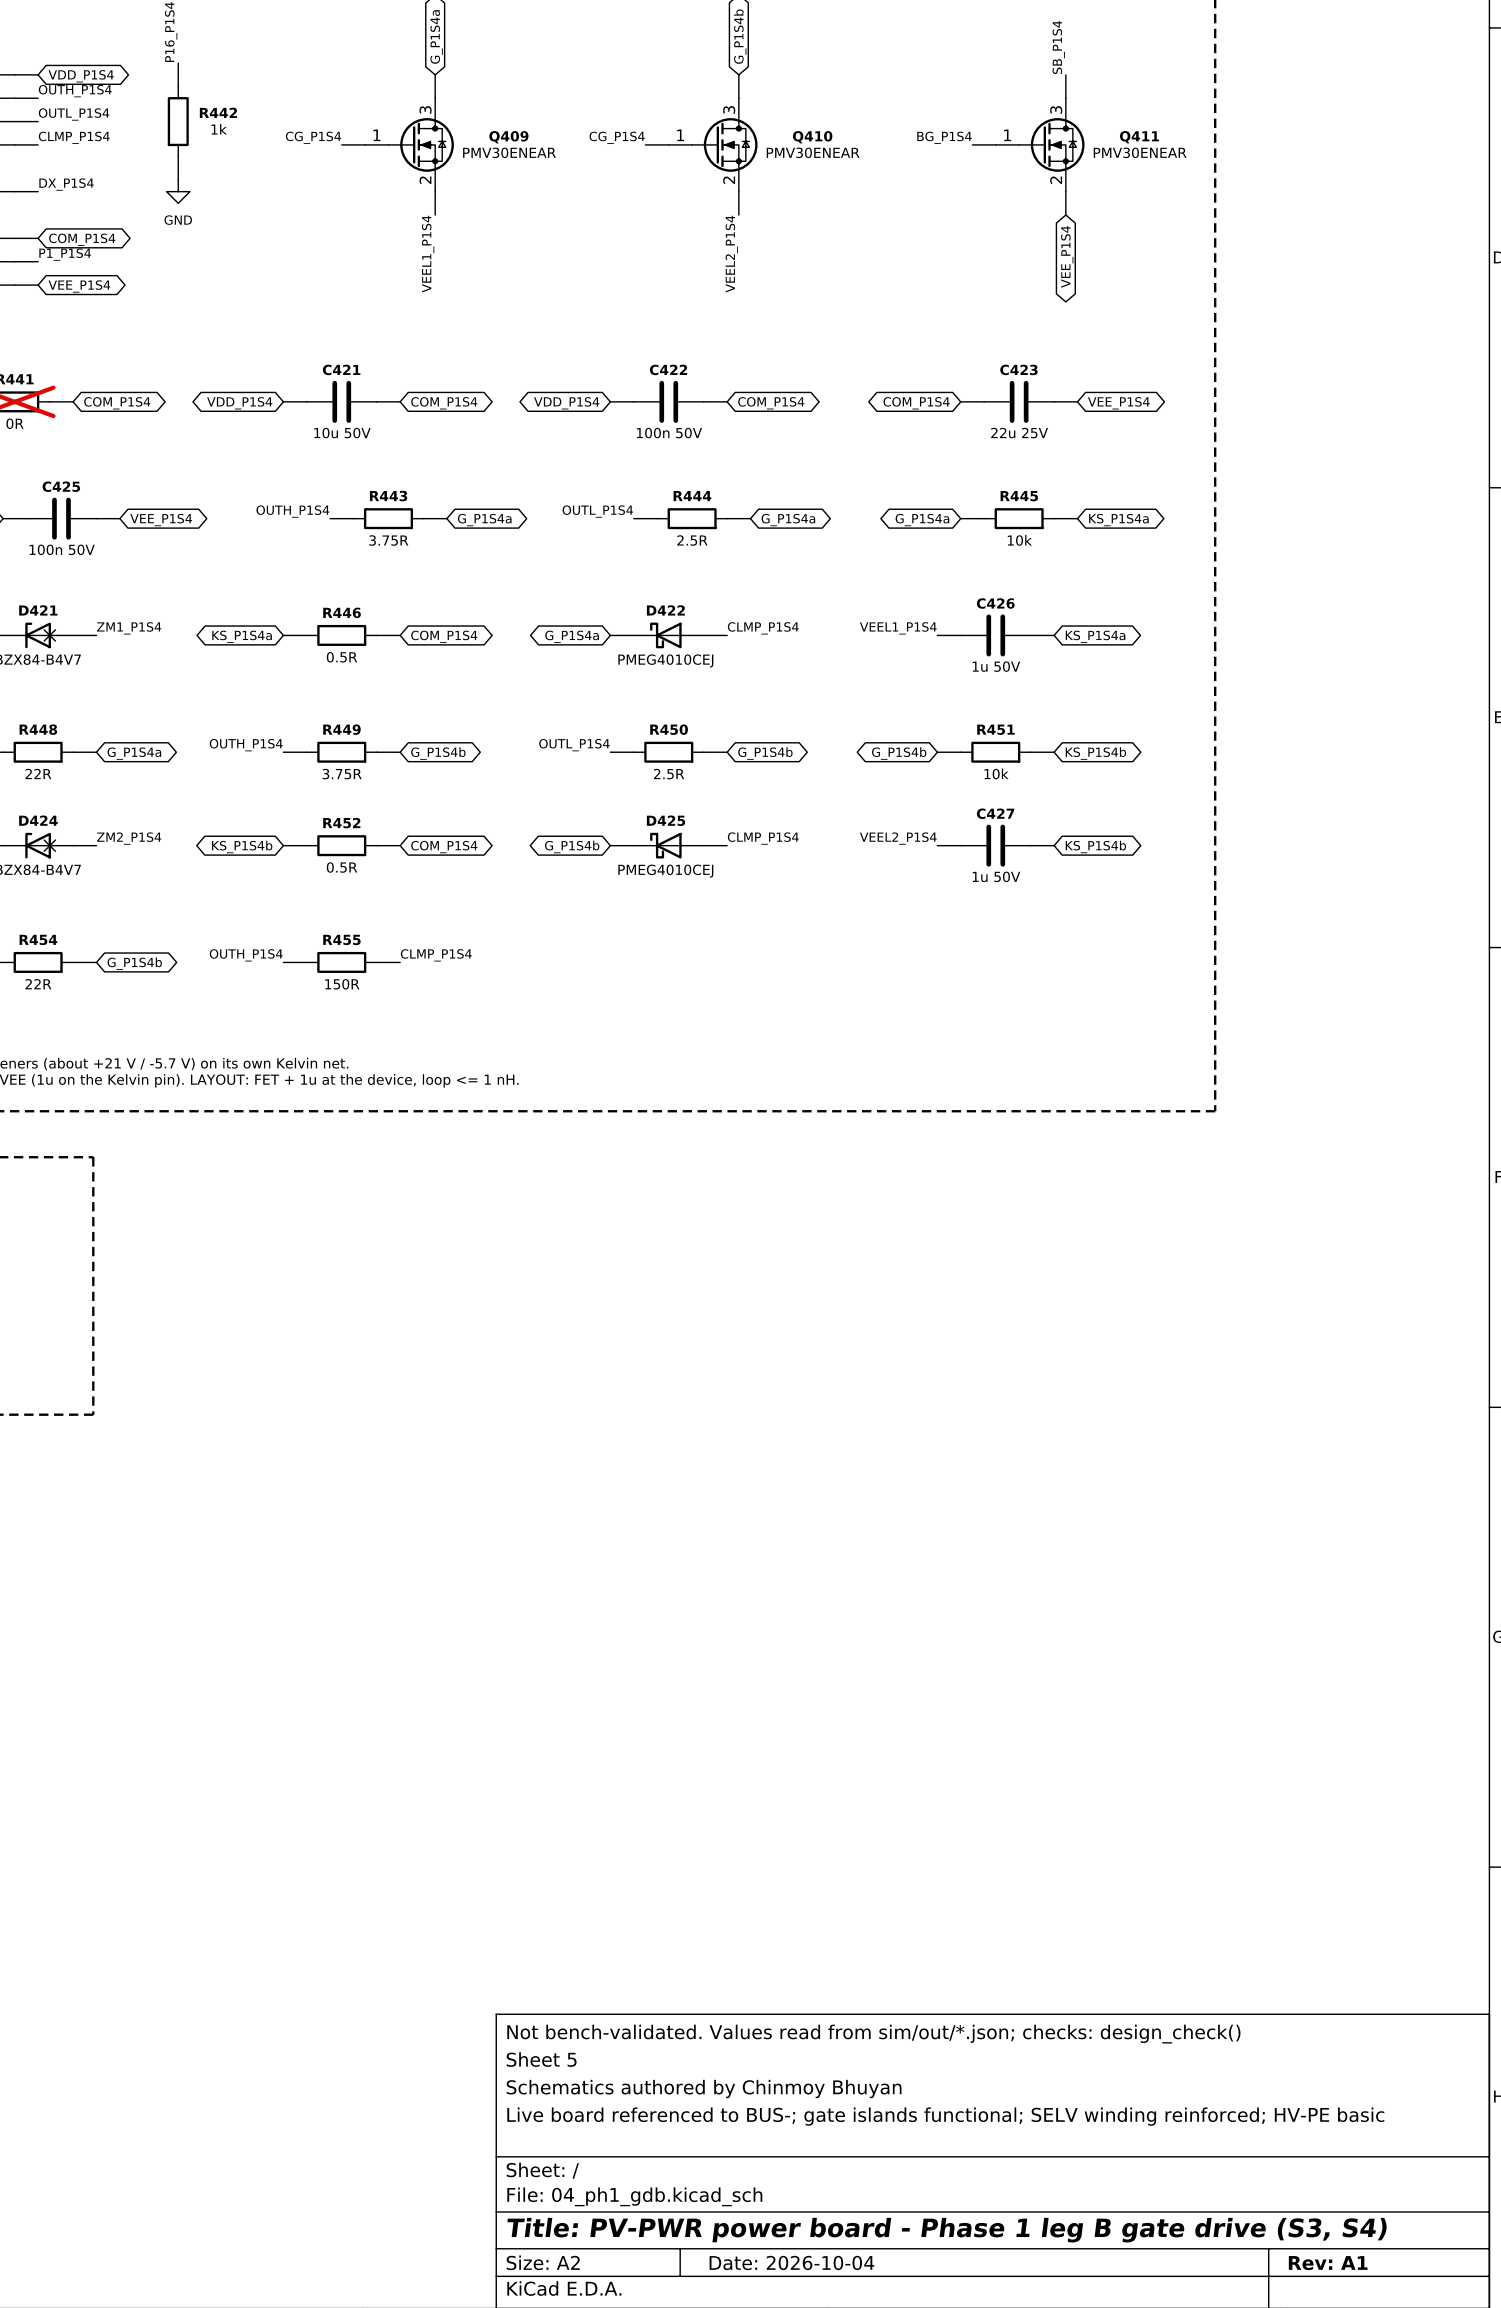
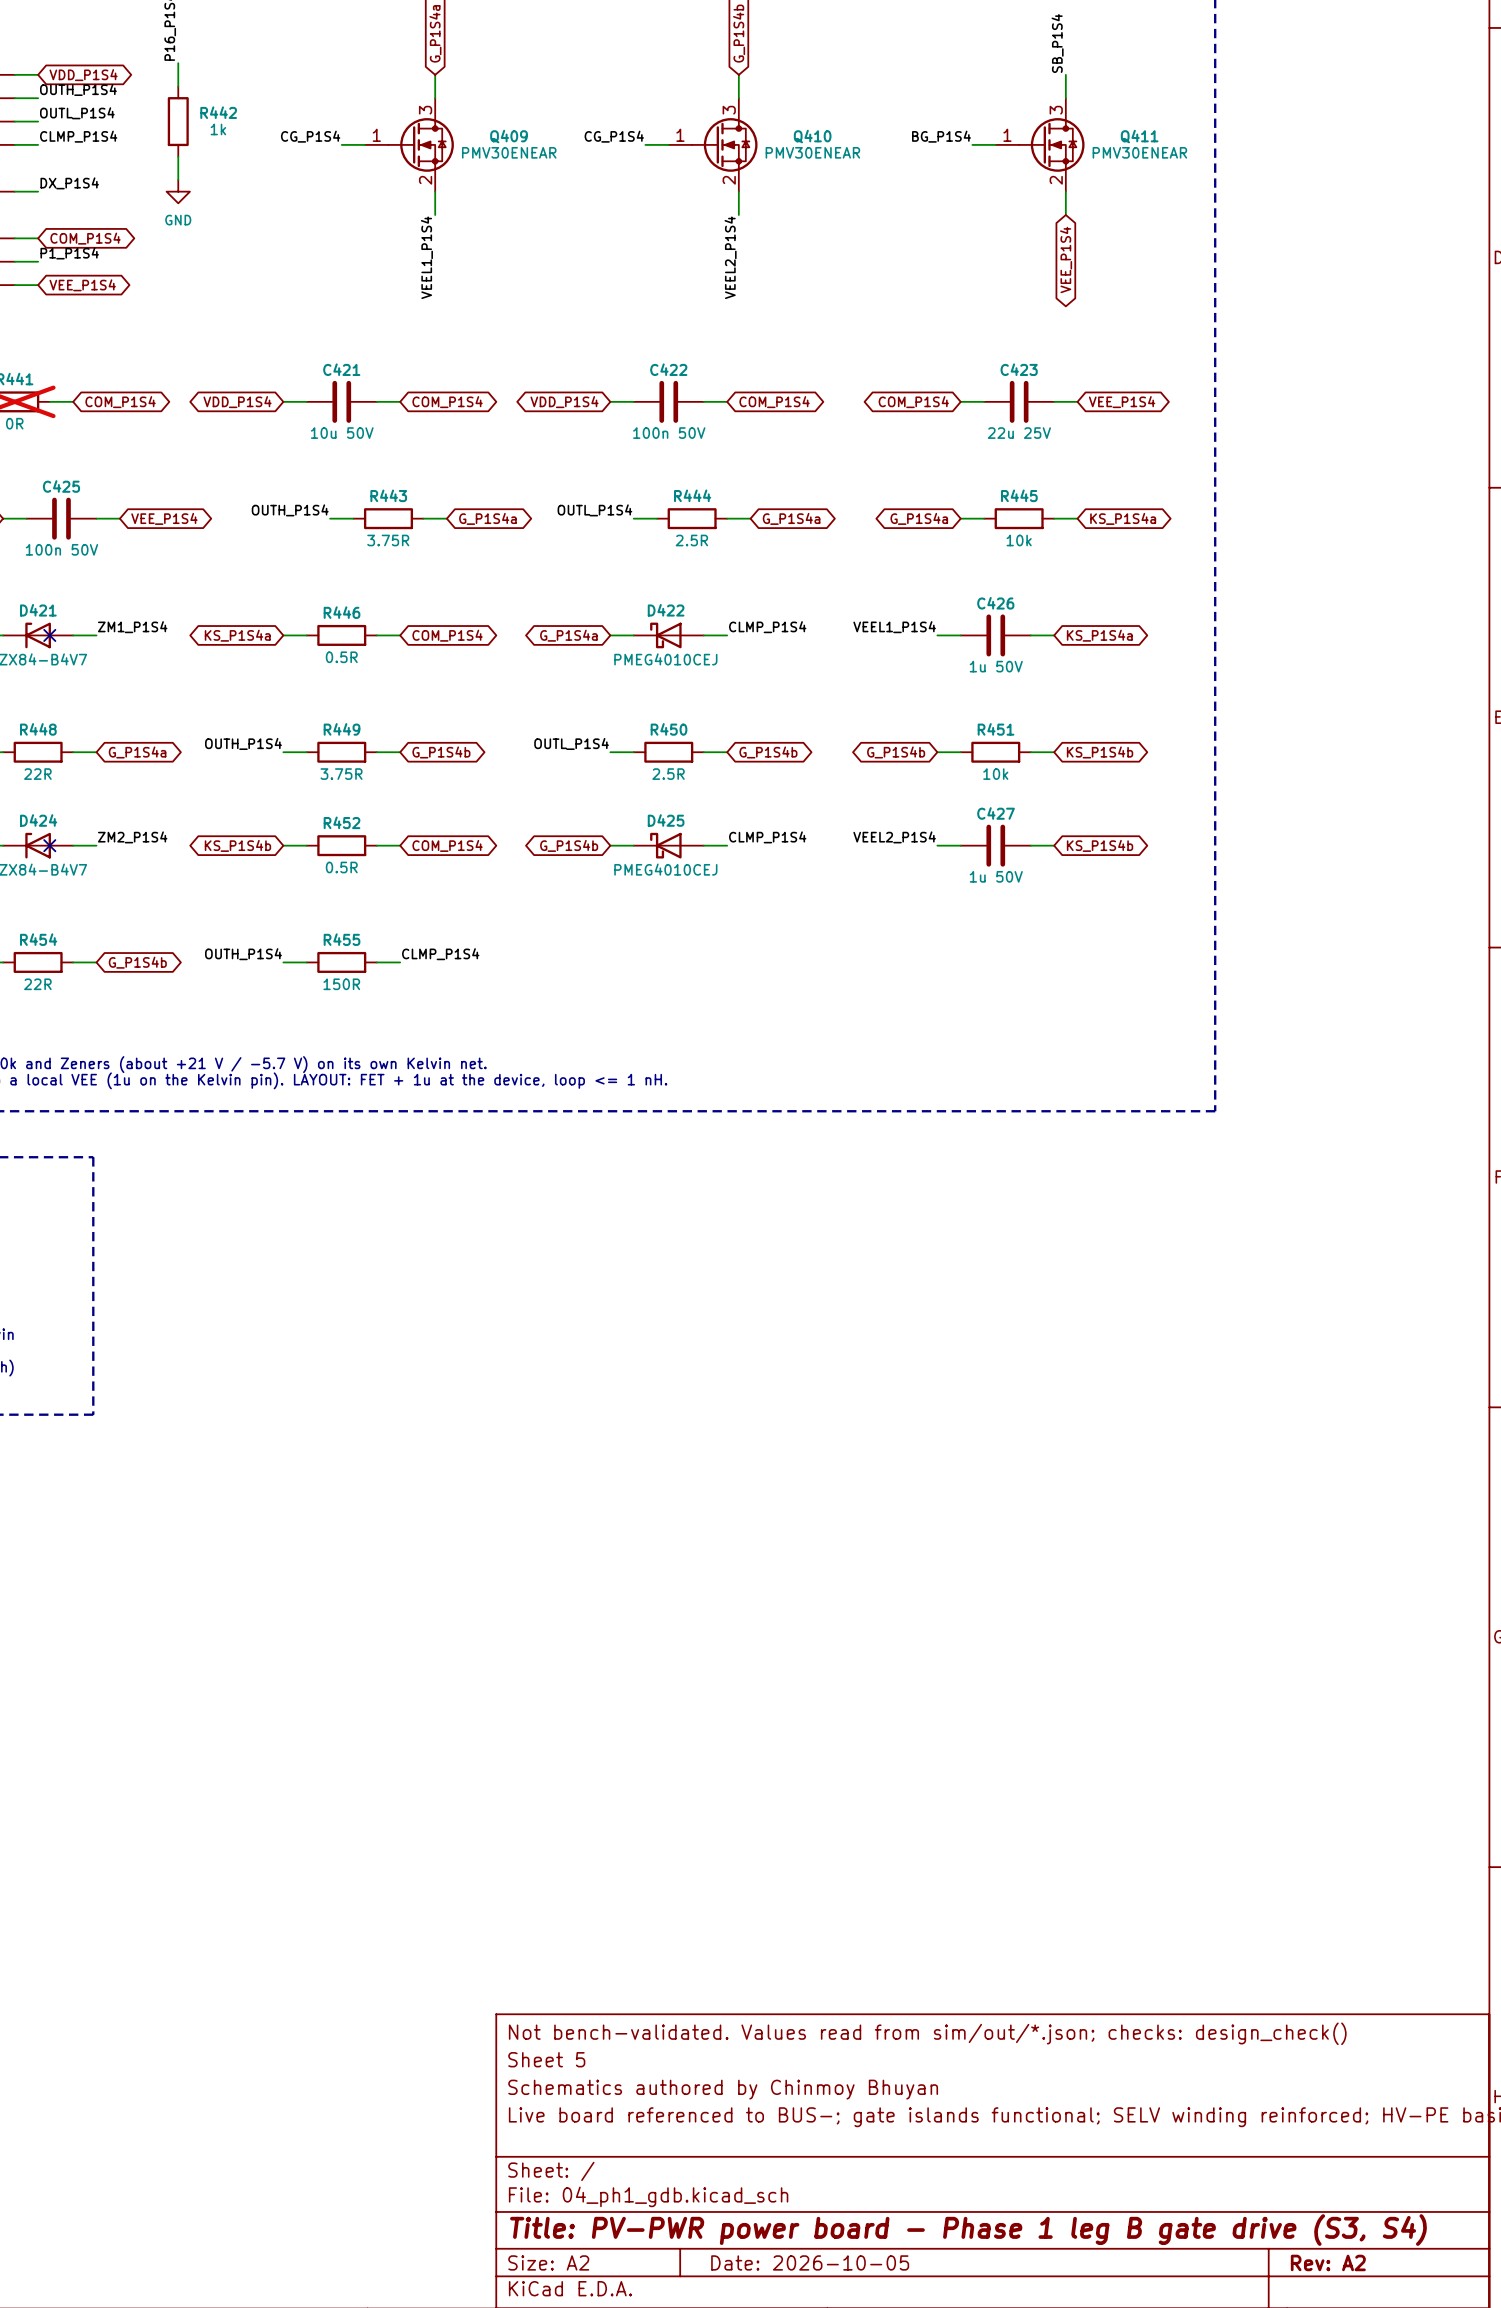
title block: Date: 2026-10-04 (791, 2262) -> Date: 2026-10-05 (810, 2262)
title block: Rev: A1 (1328, 2263) -> Rev: A2 (1328, 2262)

